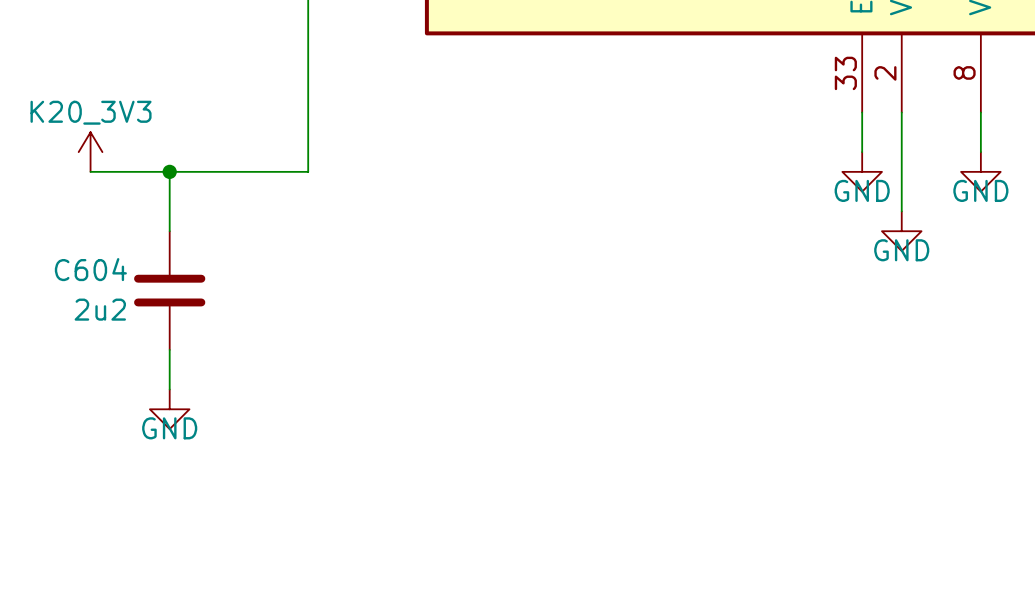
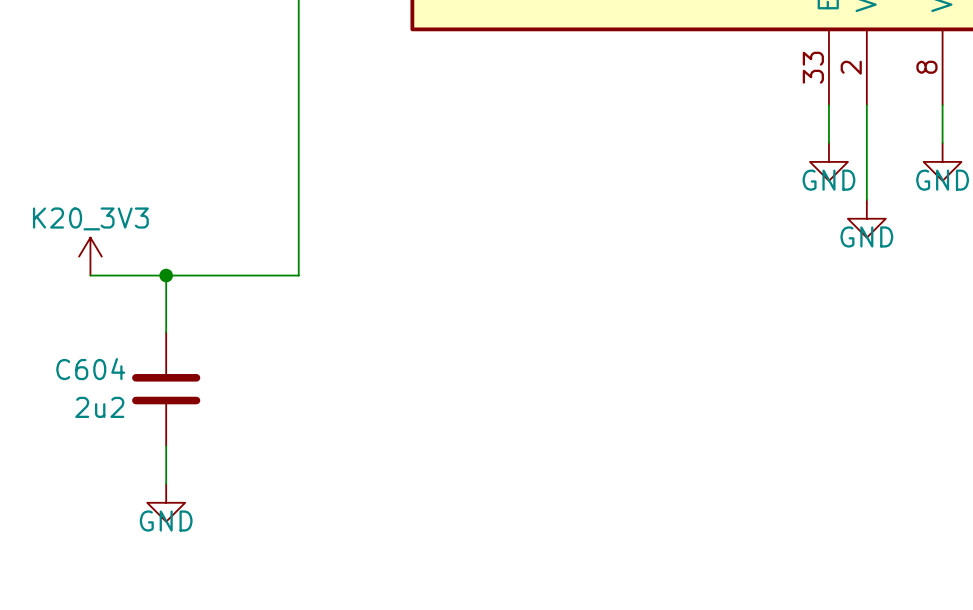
power symbol position: K20_3V3 (90, 152) -> K20_3V3 (90, 256)
wire: (90, 171) (308, 171) -> (90, 275) (298, 275) (298, 161)
wire: (169, 171) (169, 231) -> none
junction: (169, 171) -> none
C604 position: (169, 290) -> (166, 389)
junction: none -> (166, 275)
power symbol position: GND (169, 409) -> GND (166, 502)
wire: none -> (166, 445) (166, 483)

